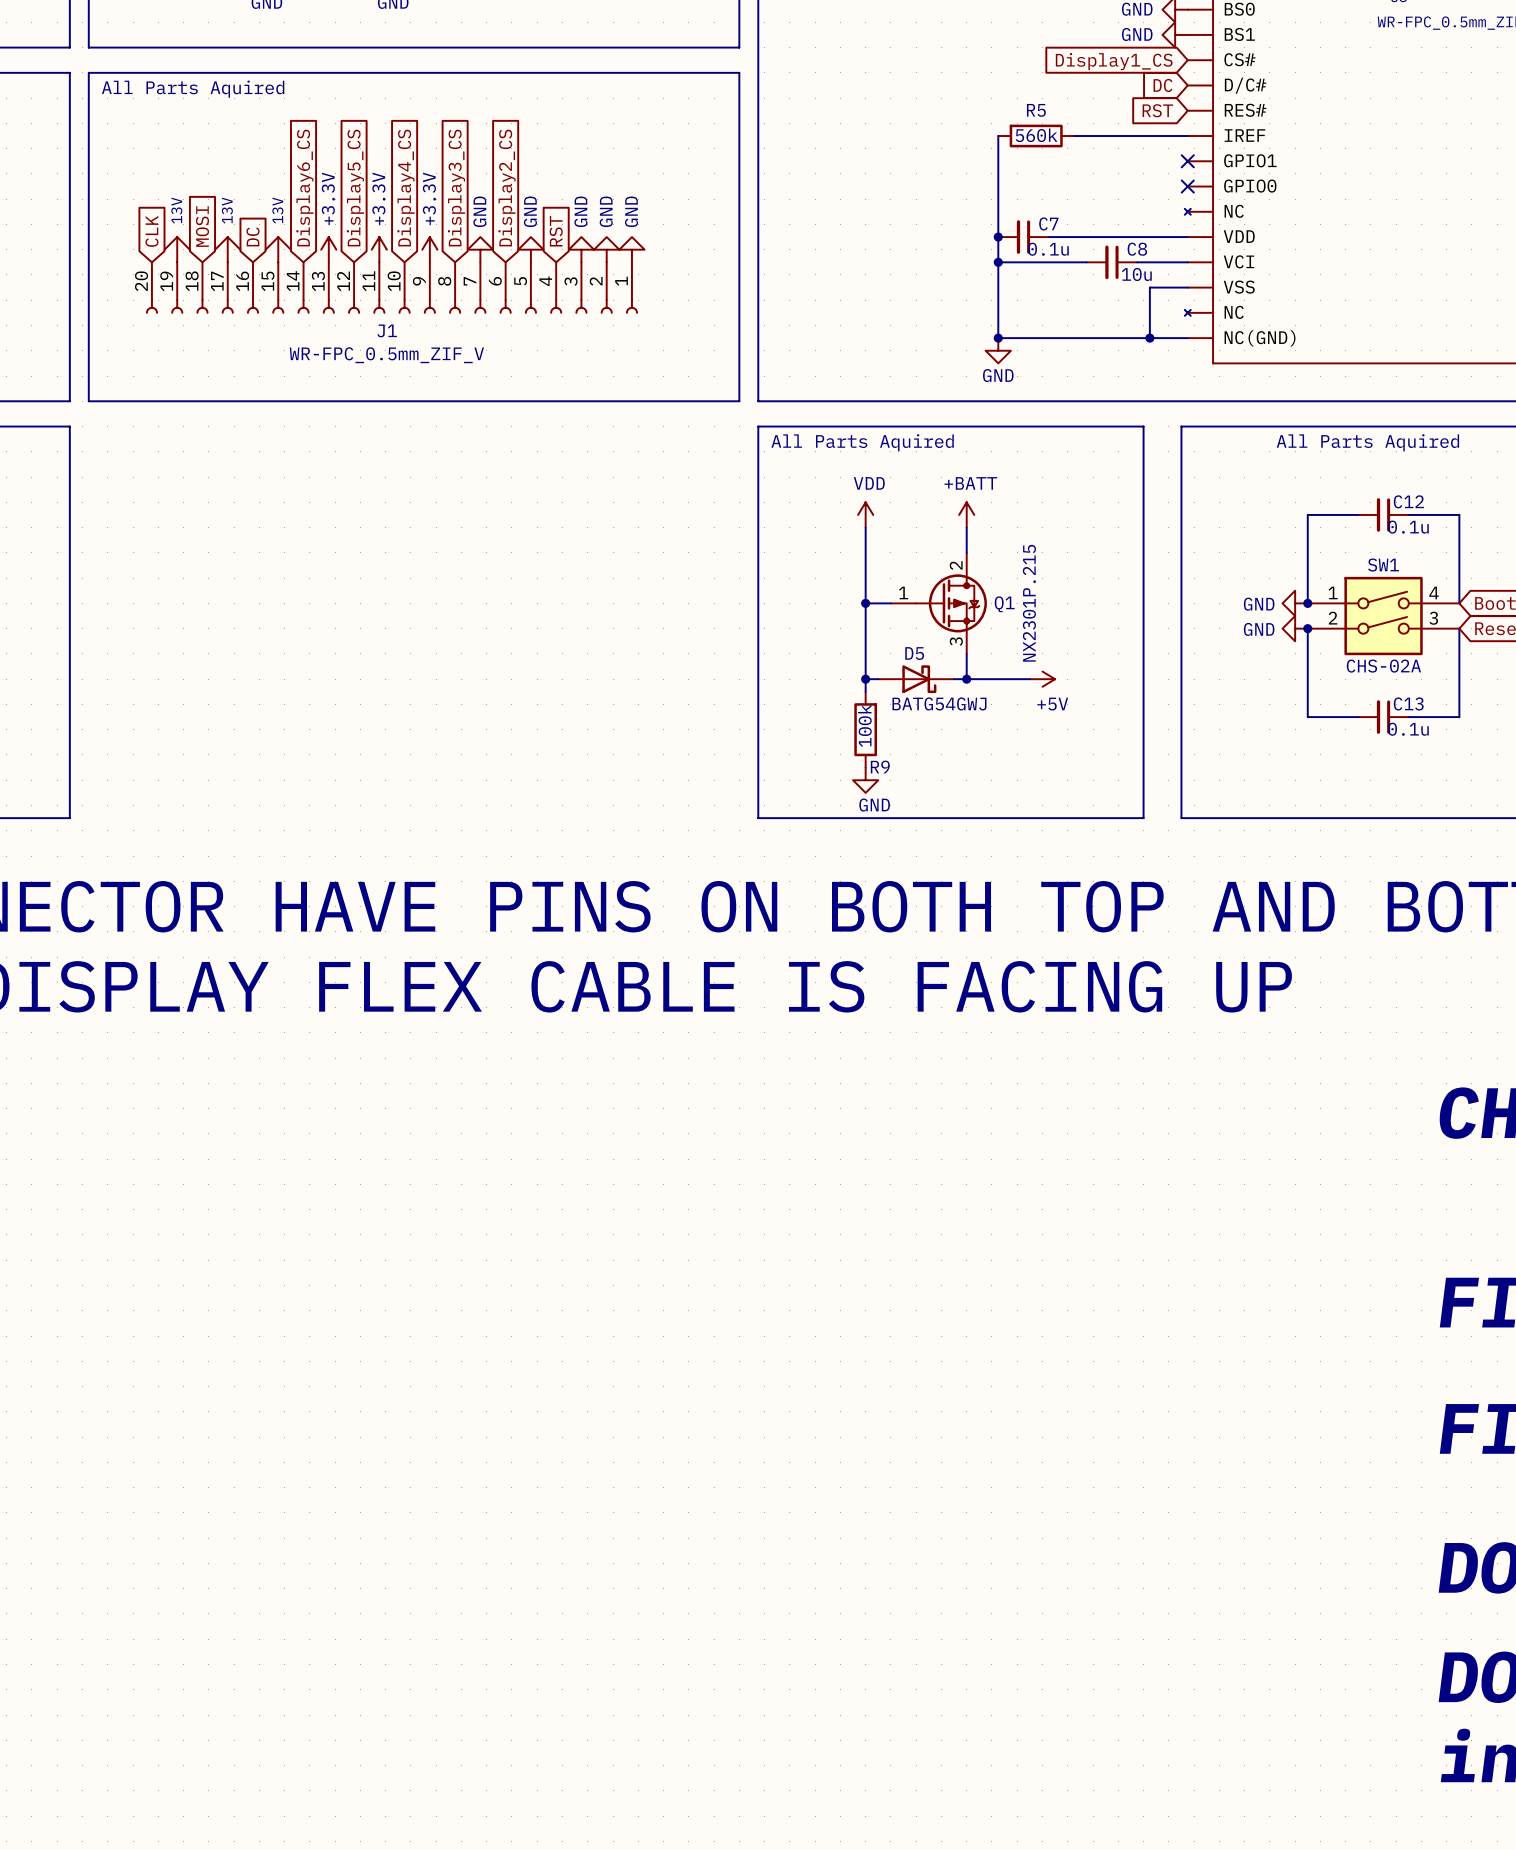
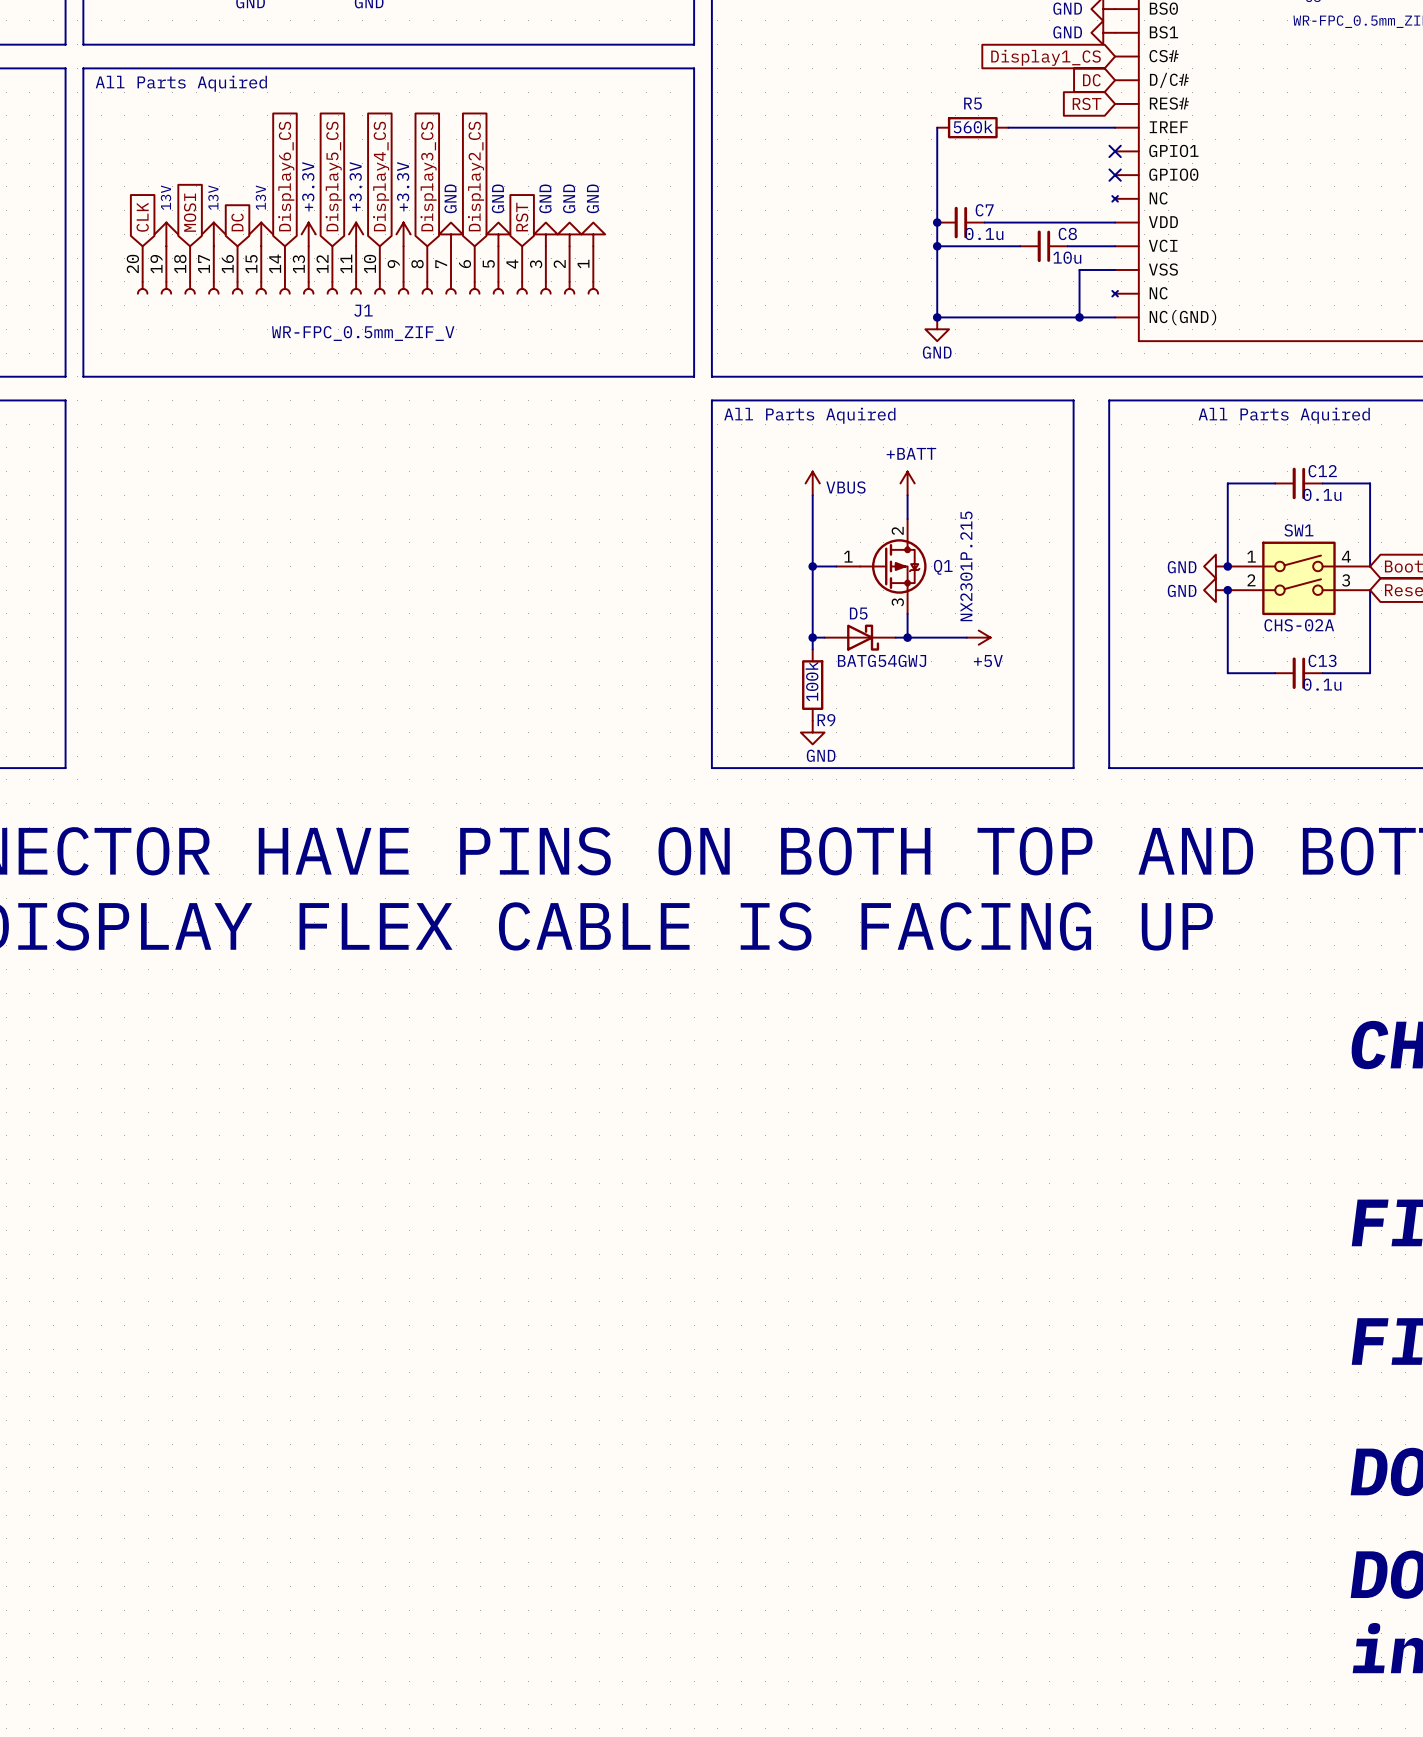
power symbol: VDD (865, 514) -> VBUS (812, 483)

